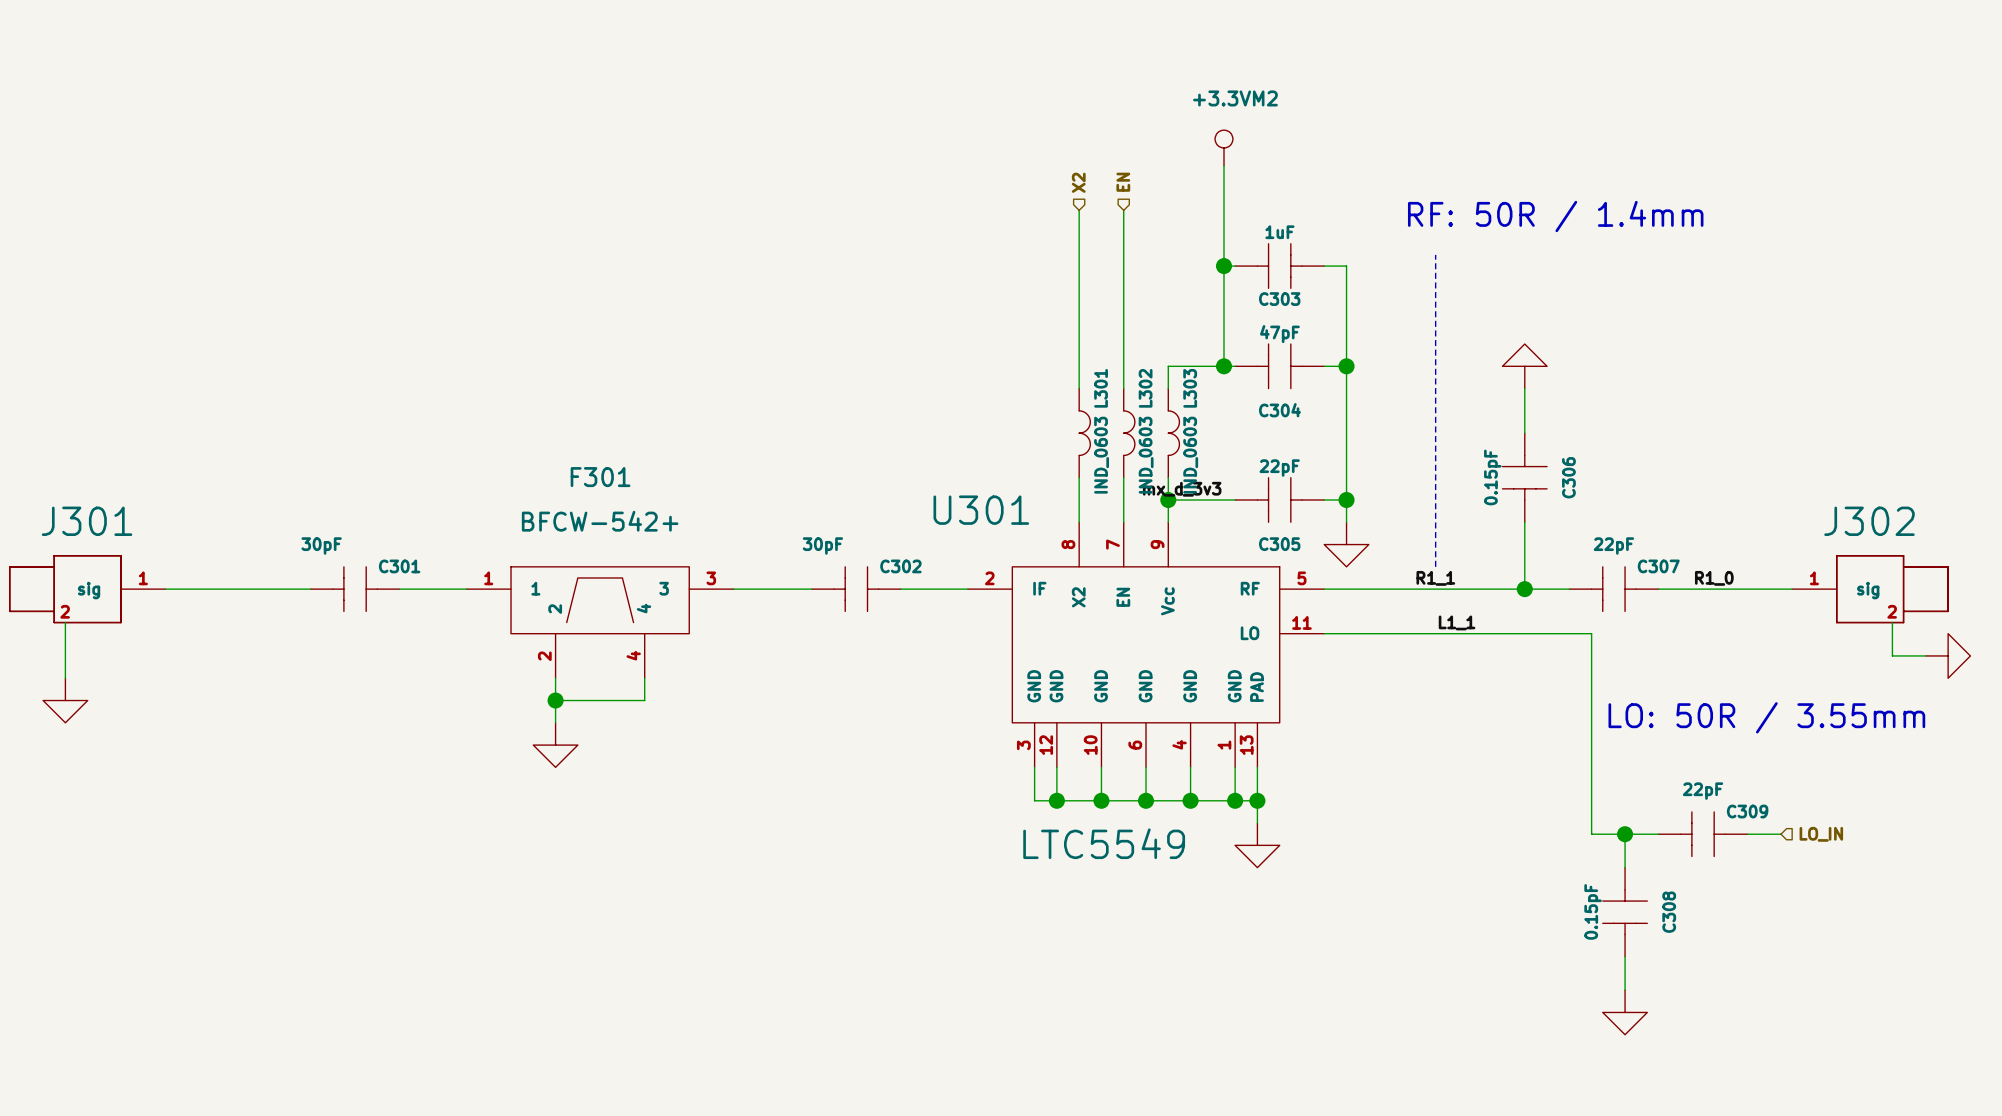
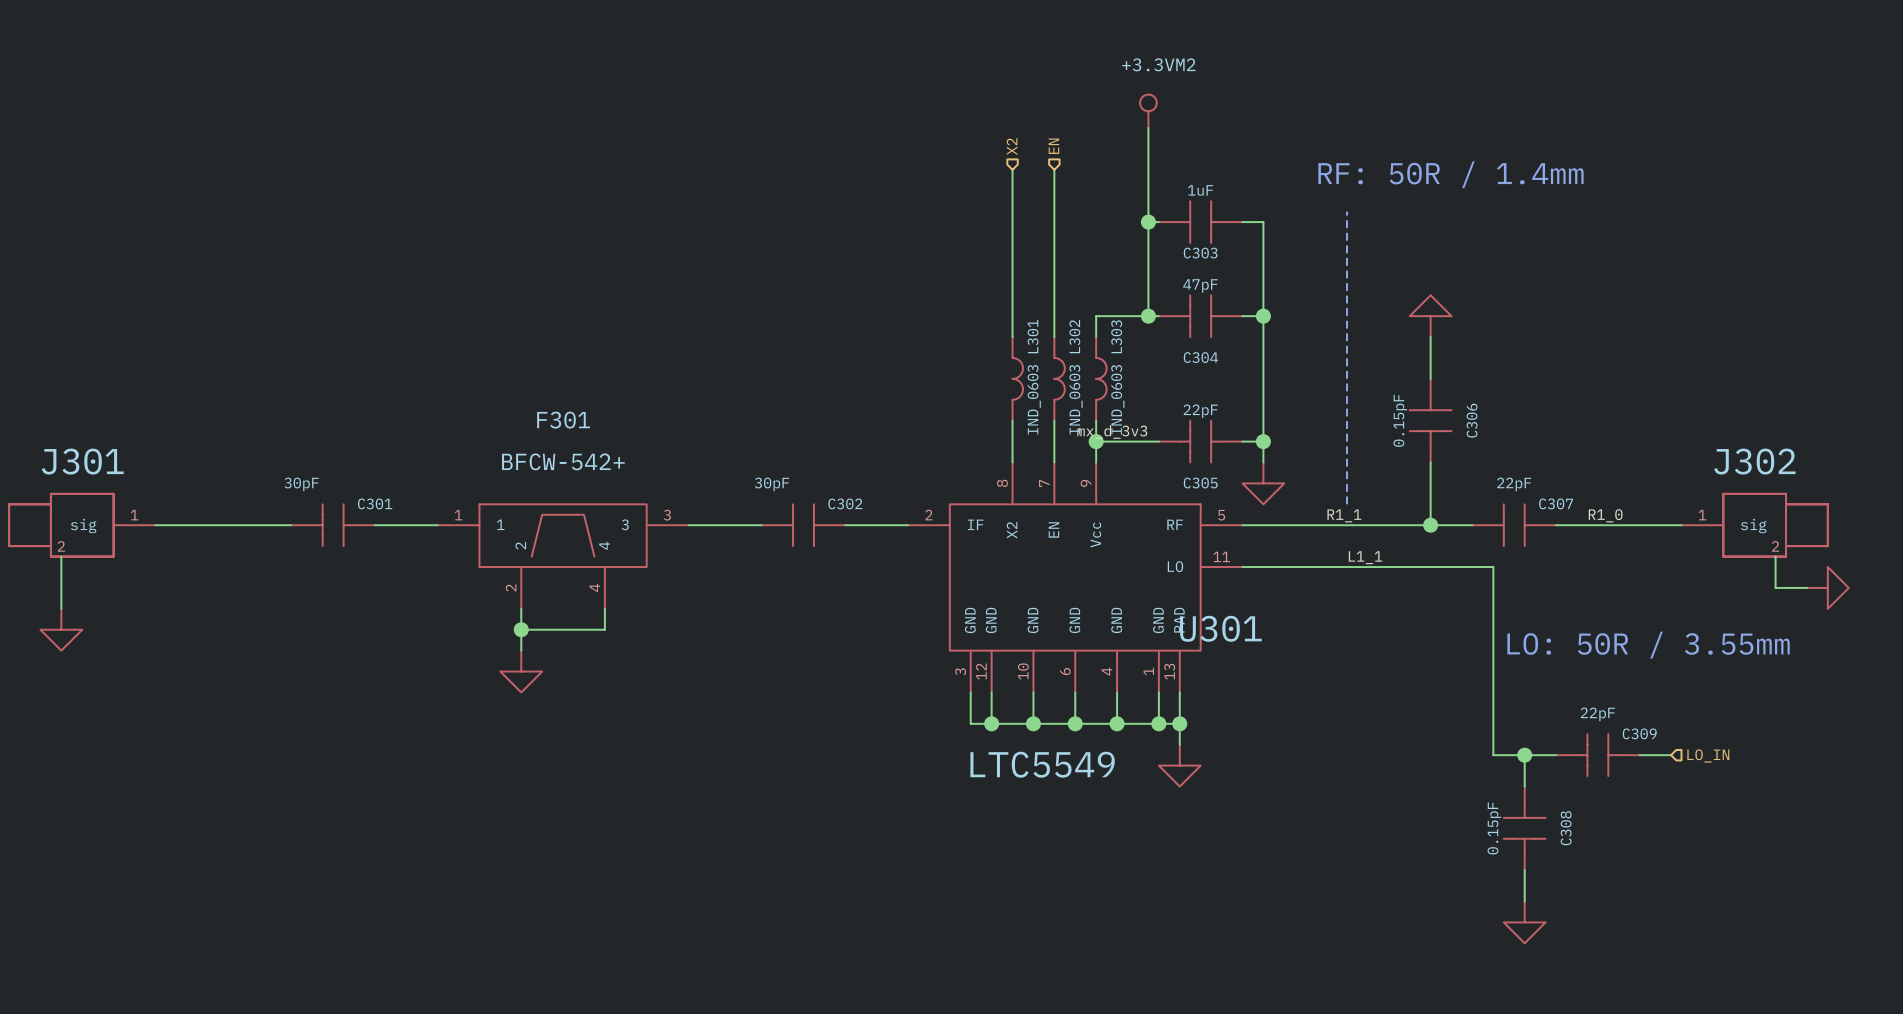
U301 name position: U301 (981, 510) -> U301 (1220, 628)

